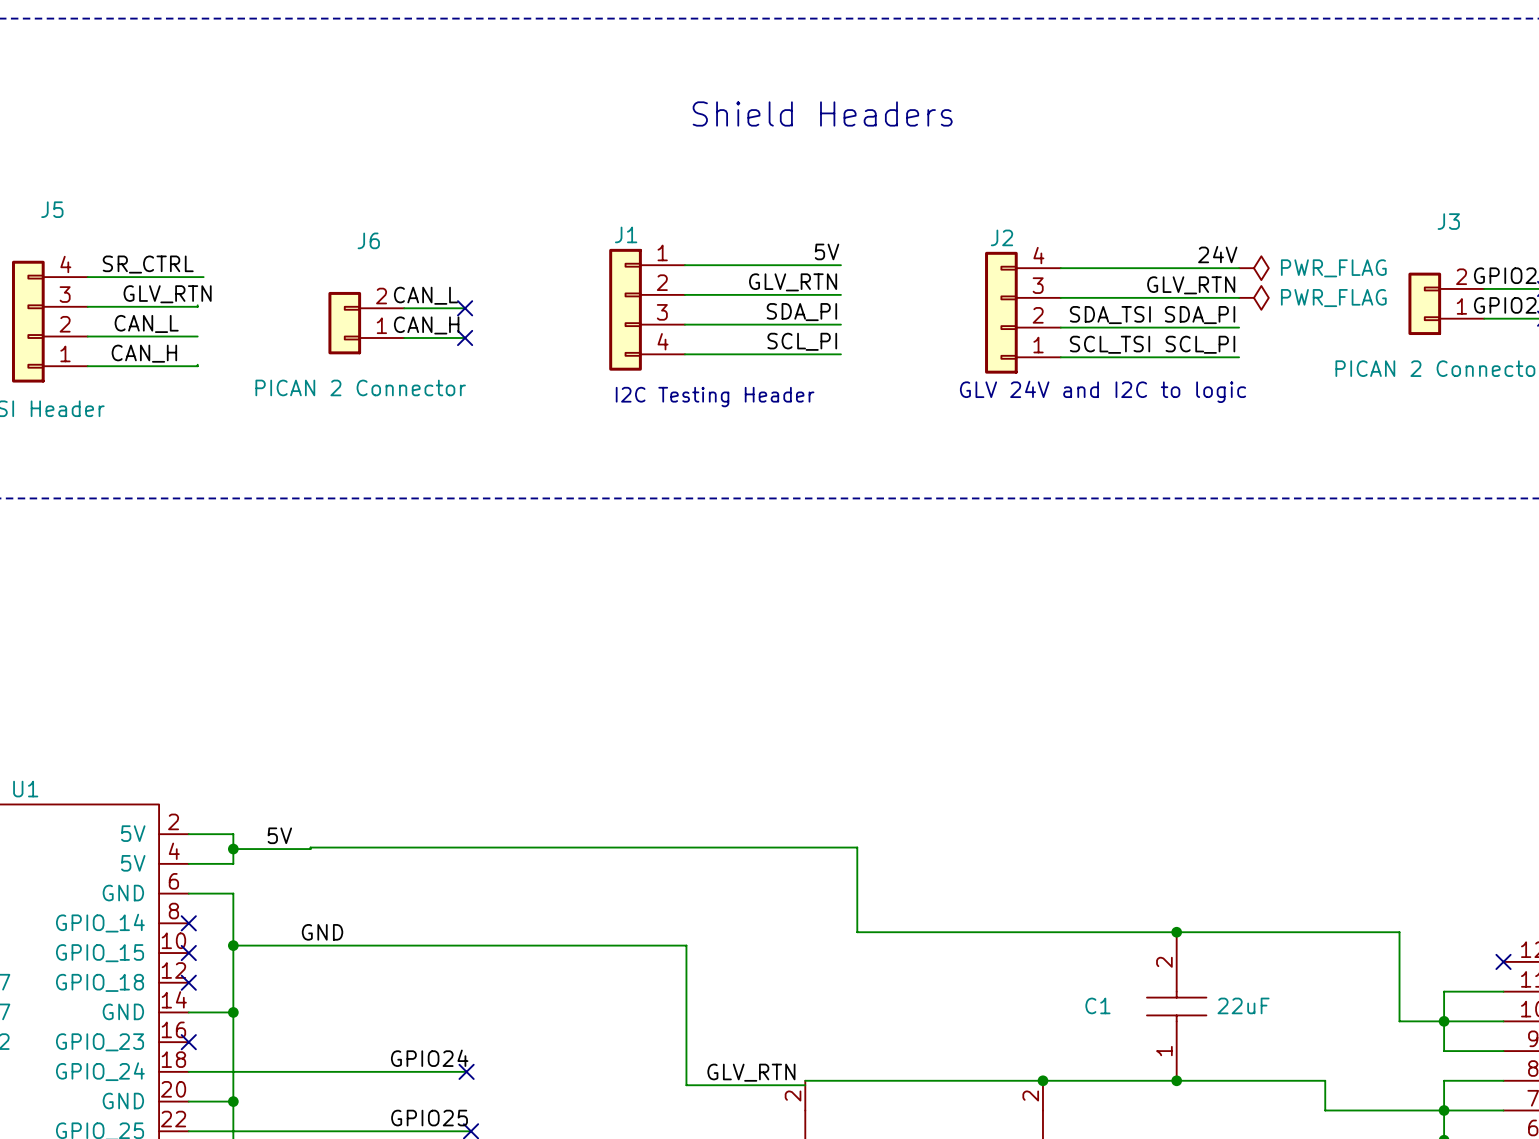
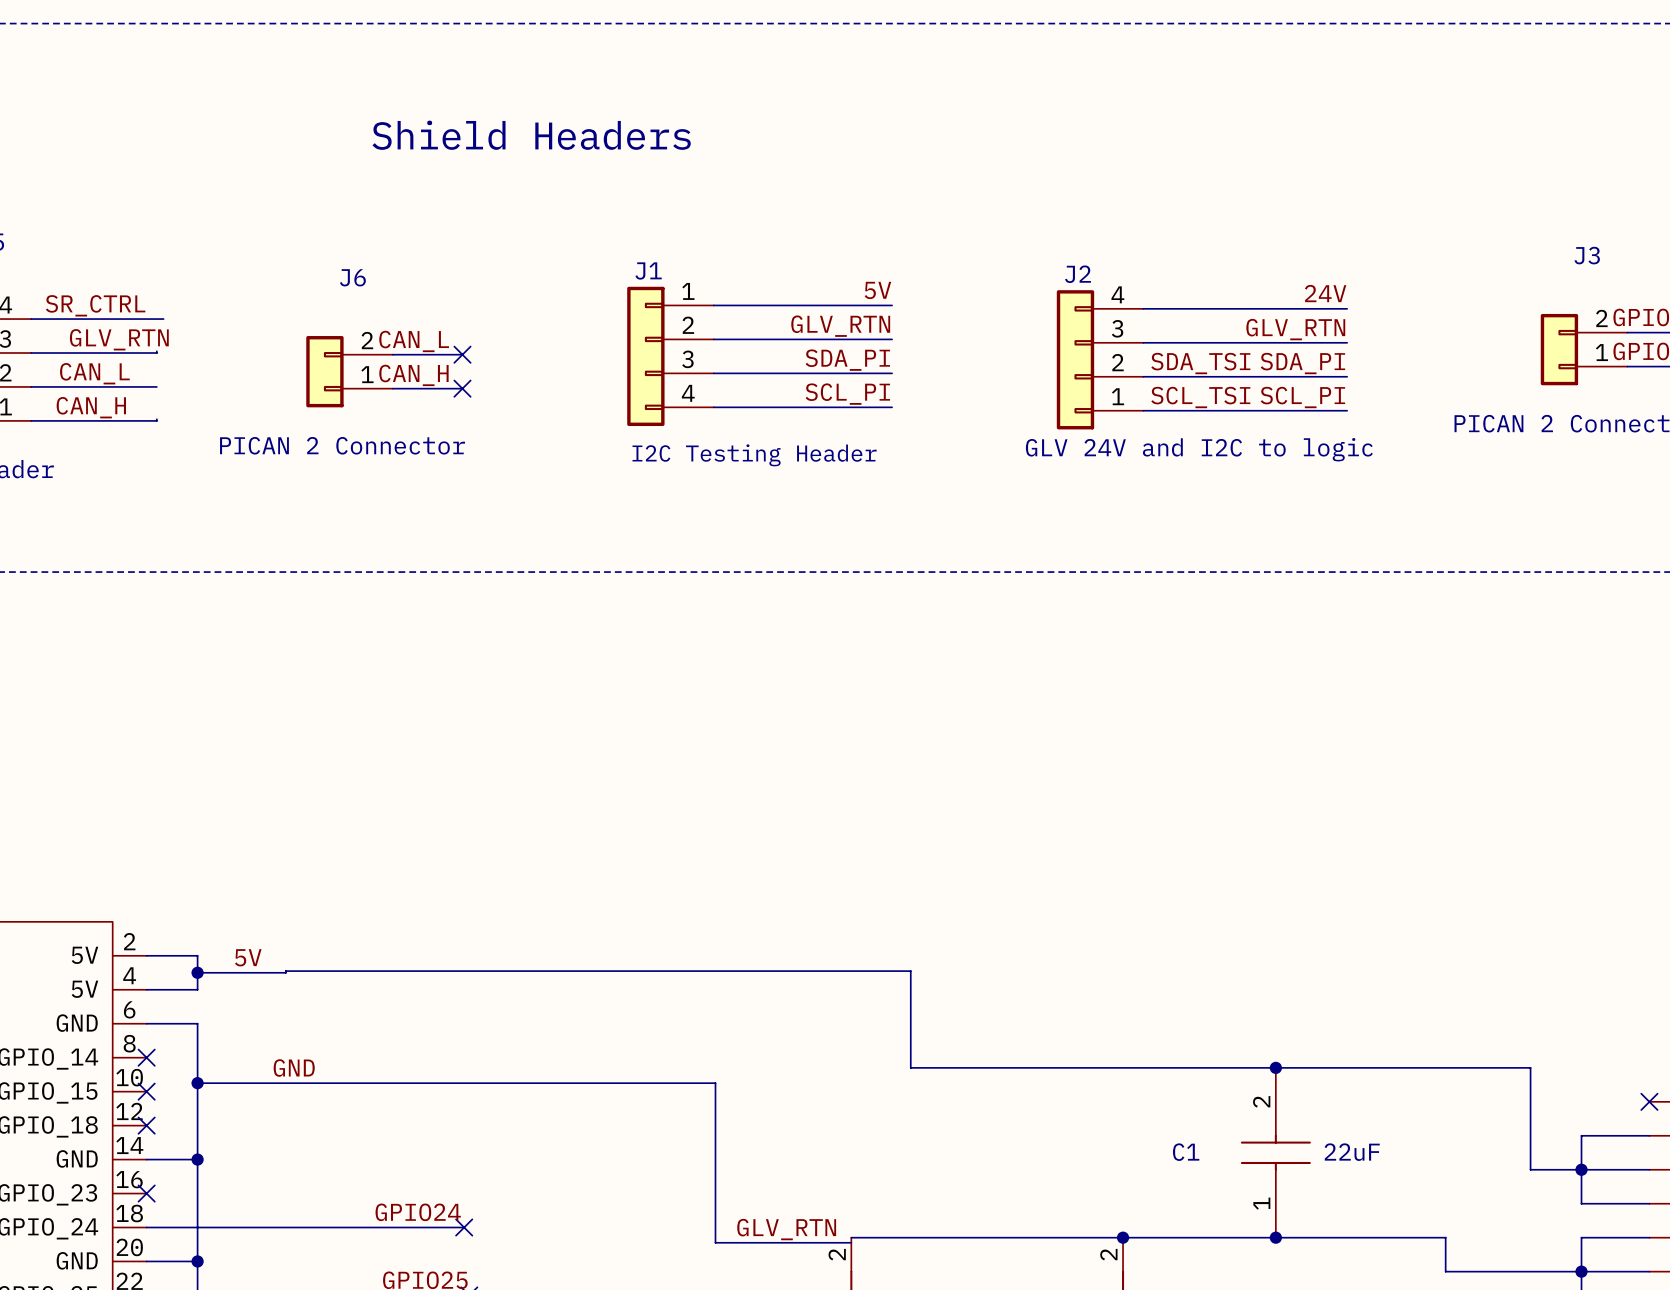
text: Shield Headers (822, 113) -> none
text: none -> Shield Headers (531, 135)
power symbol: PWR_FLAG (1253, 268) -> none
power symbol: PWR_FLAG (1253, 297) -> none

